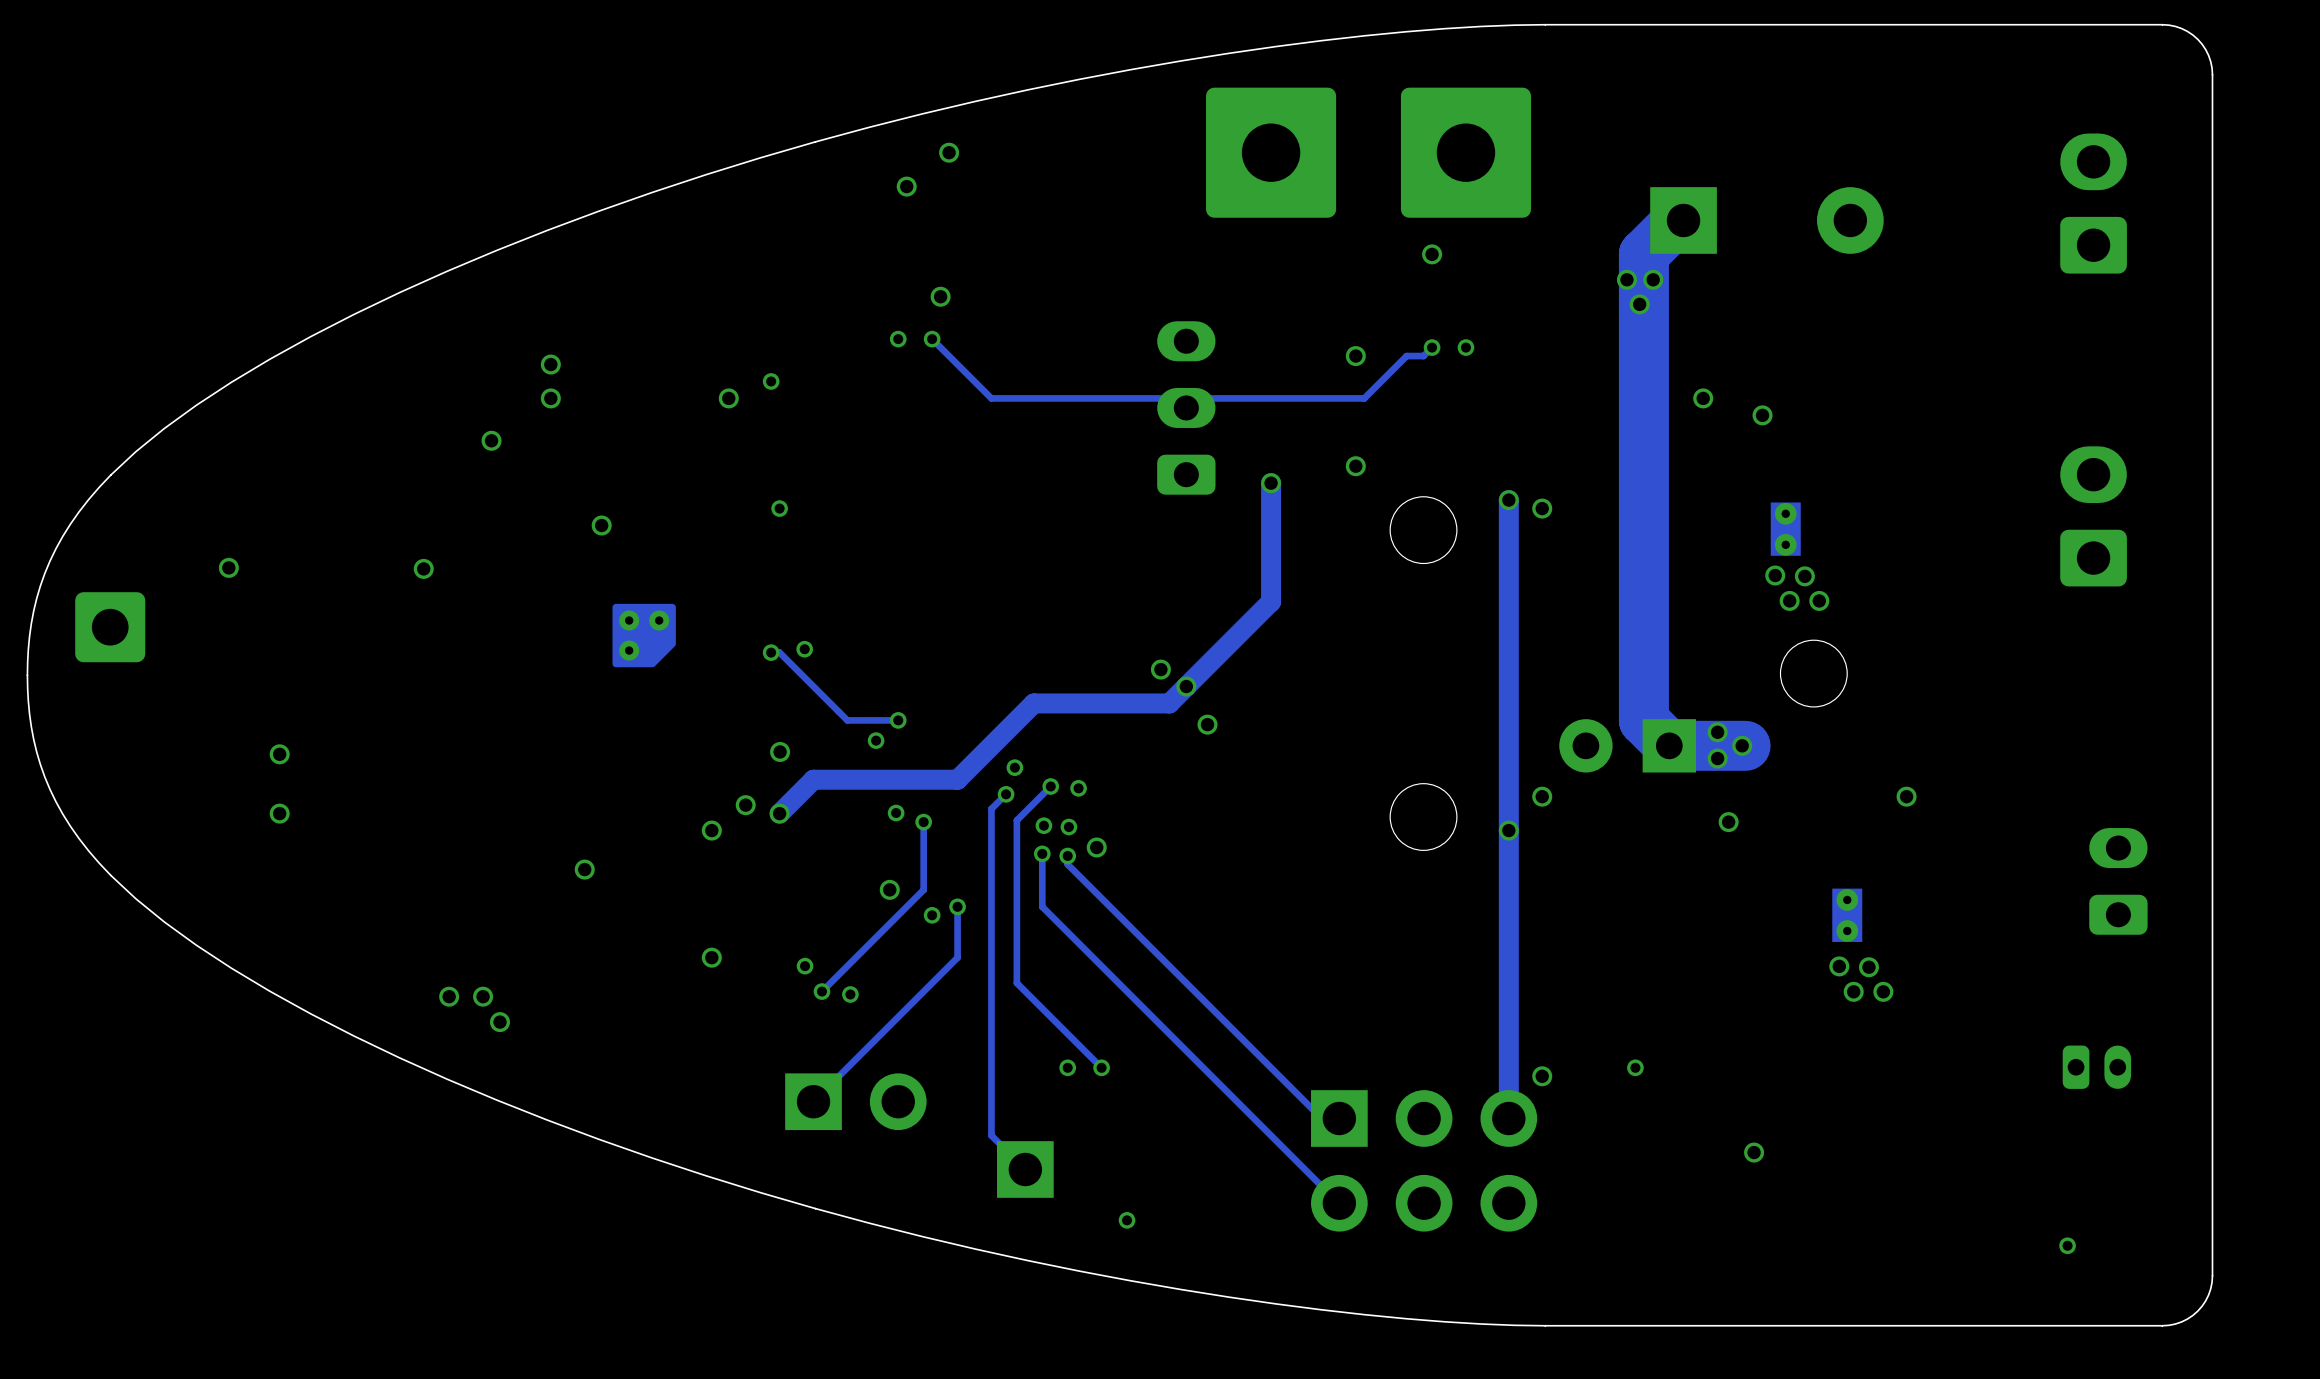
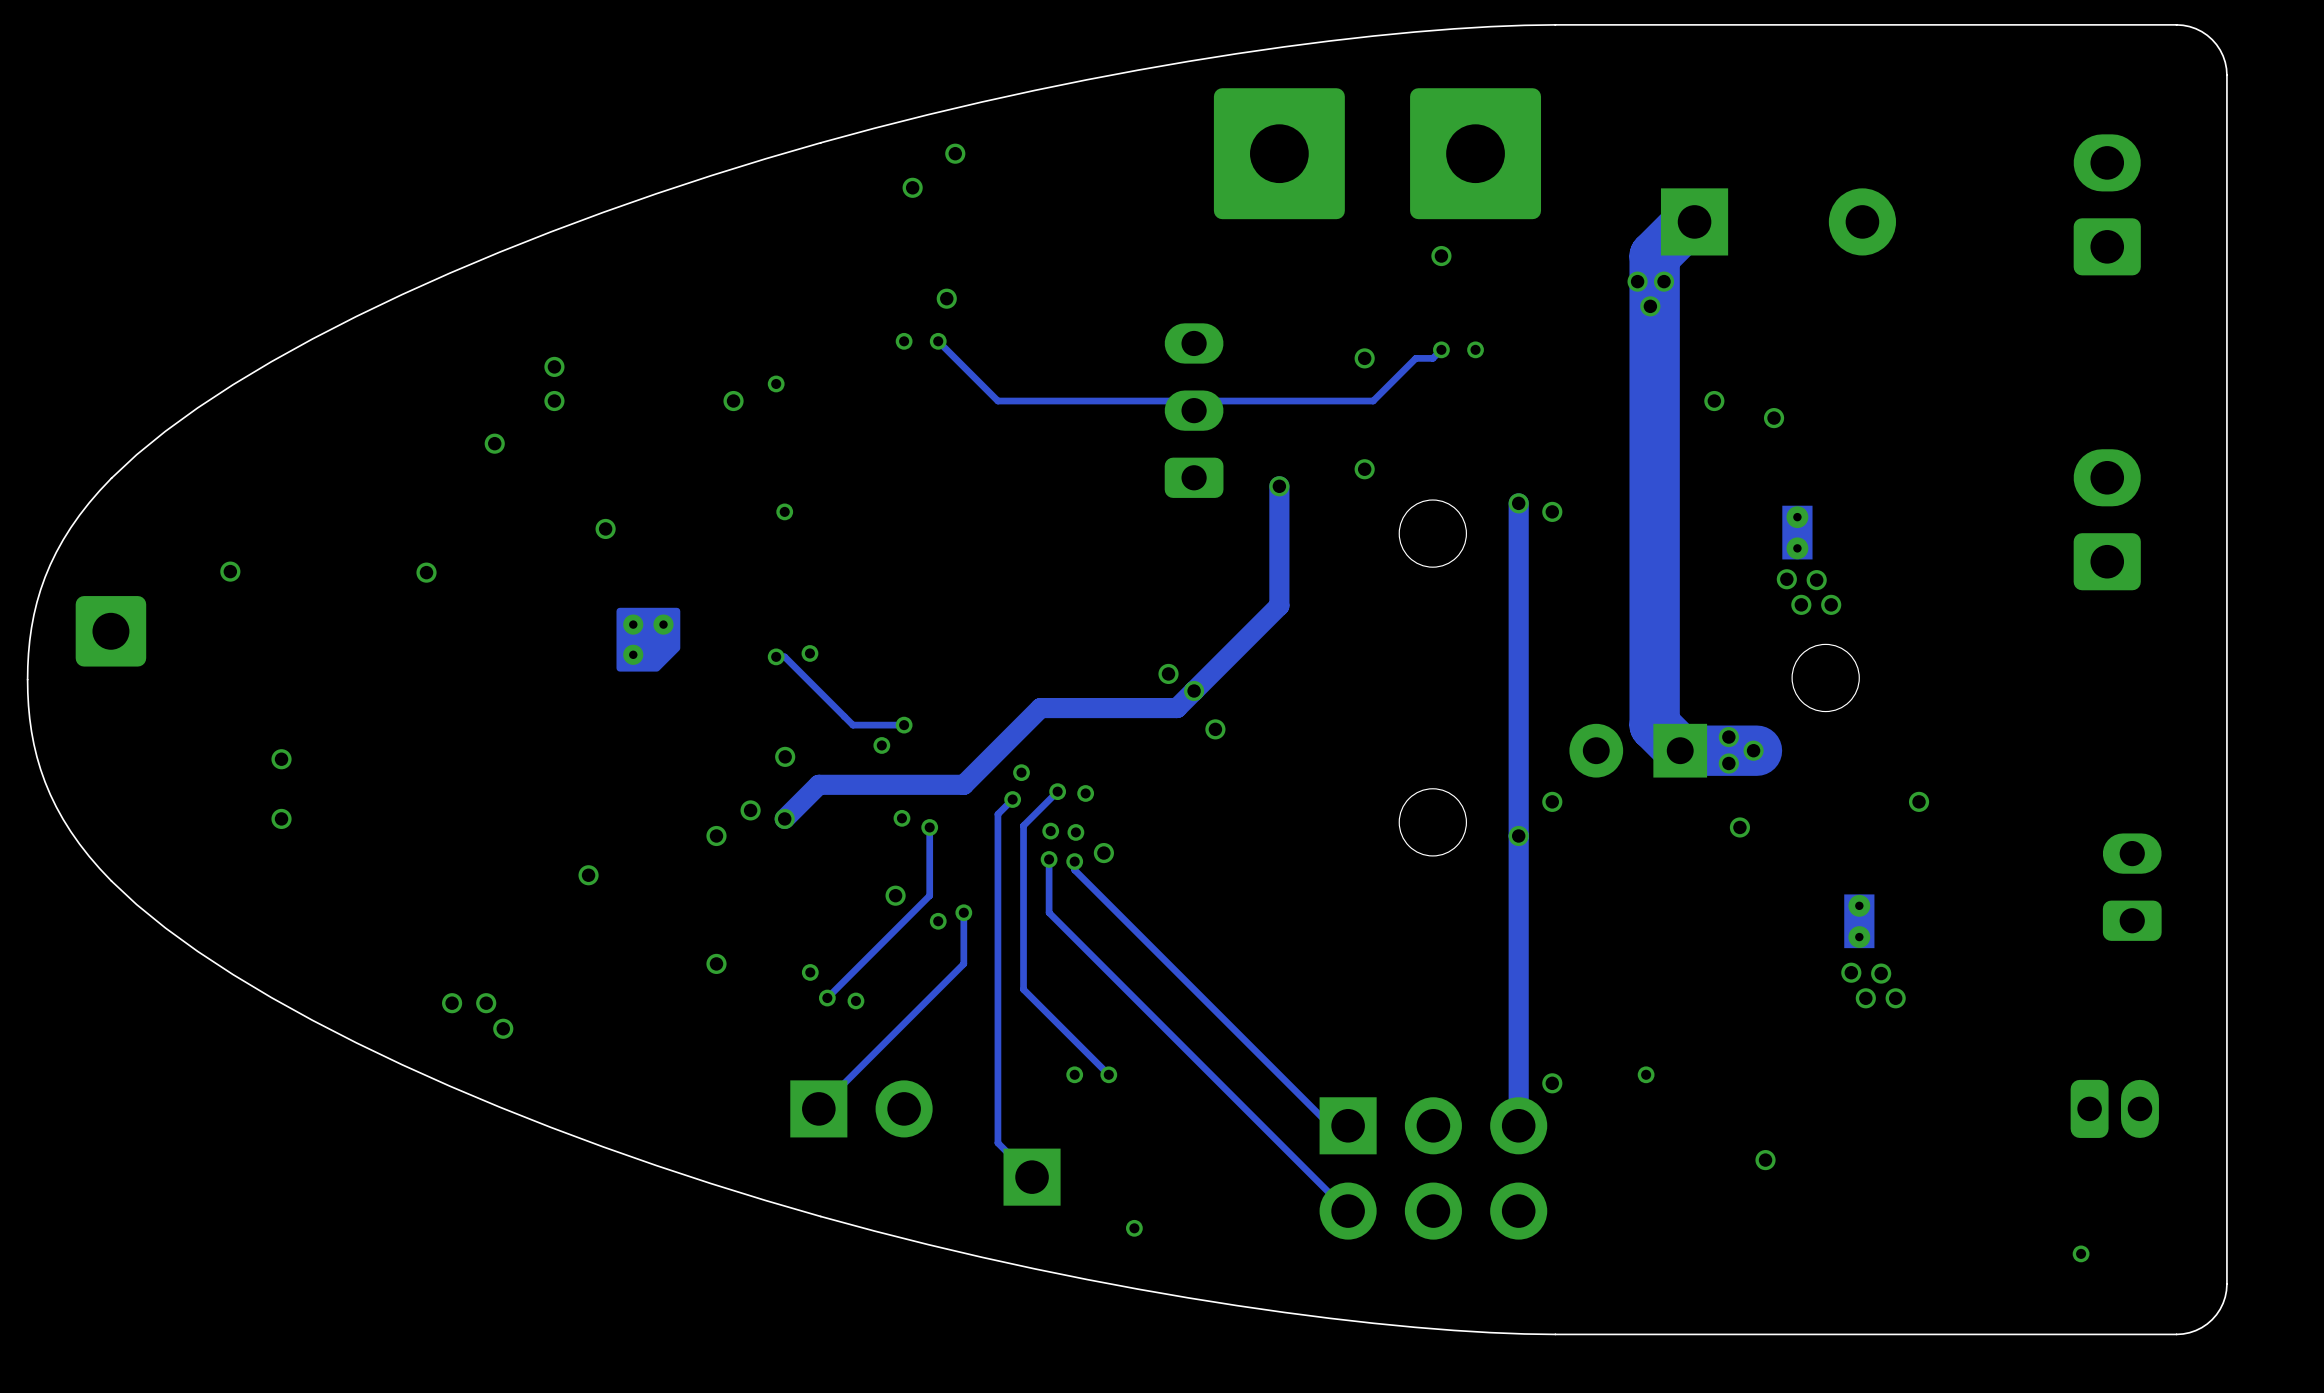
part: (2096, 1067) -> none
part: none -> (2114, 1108)

